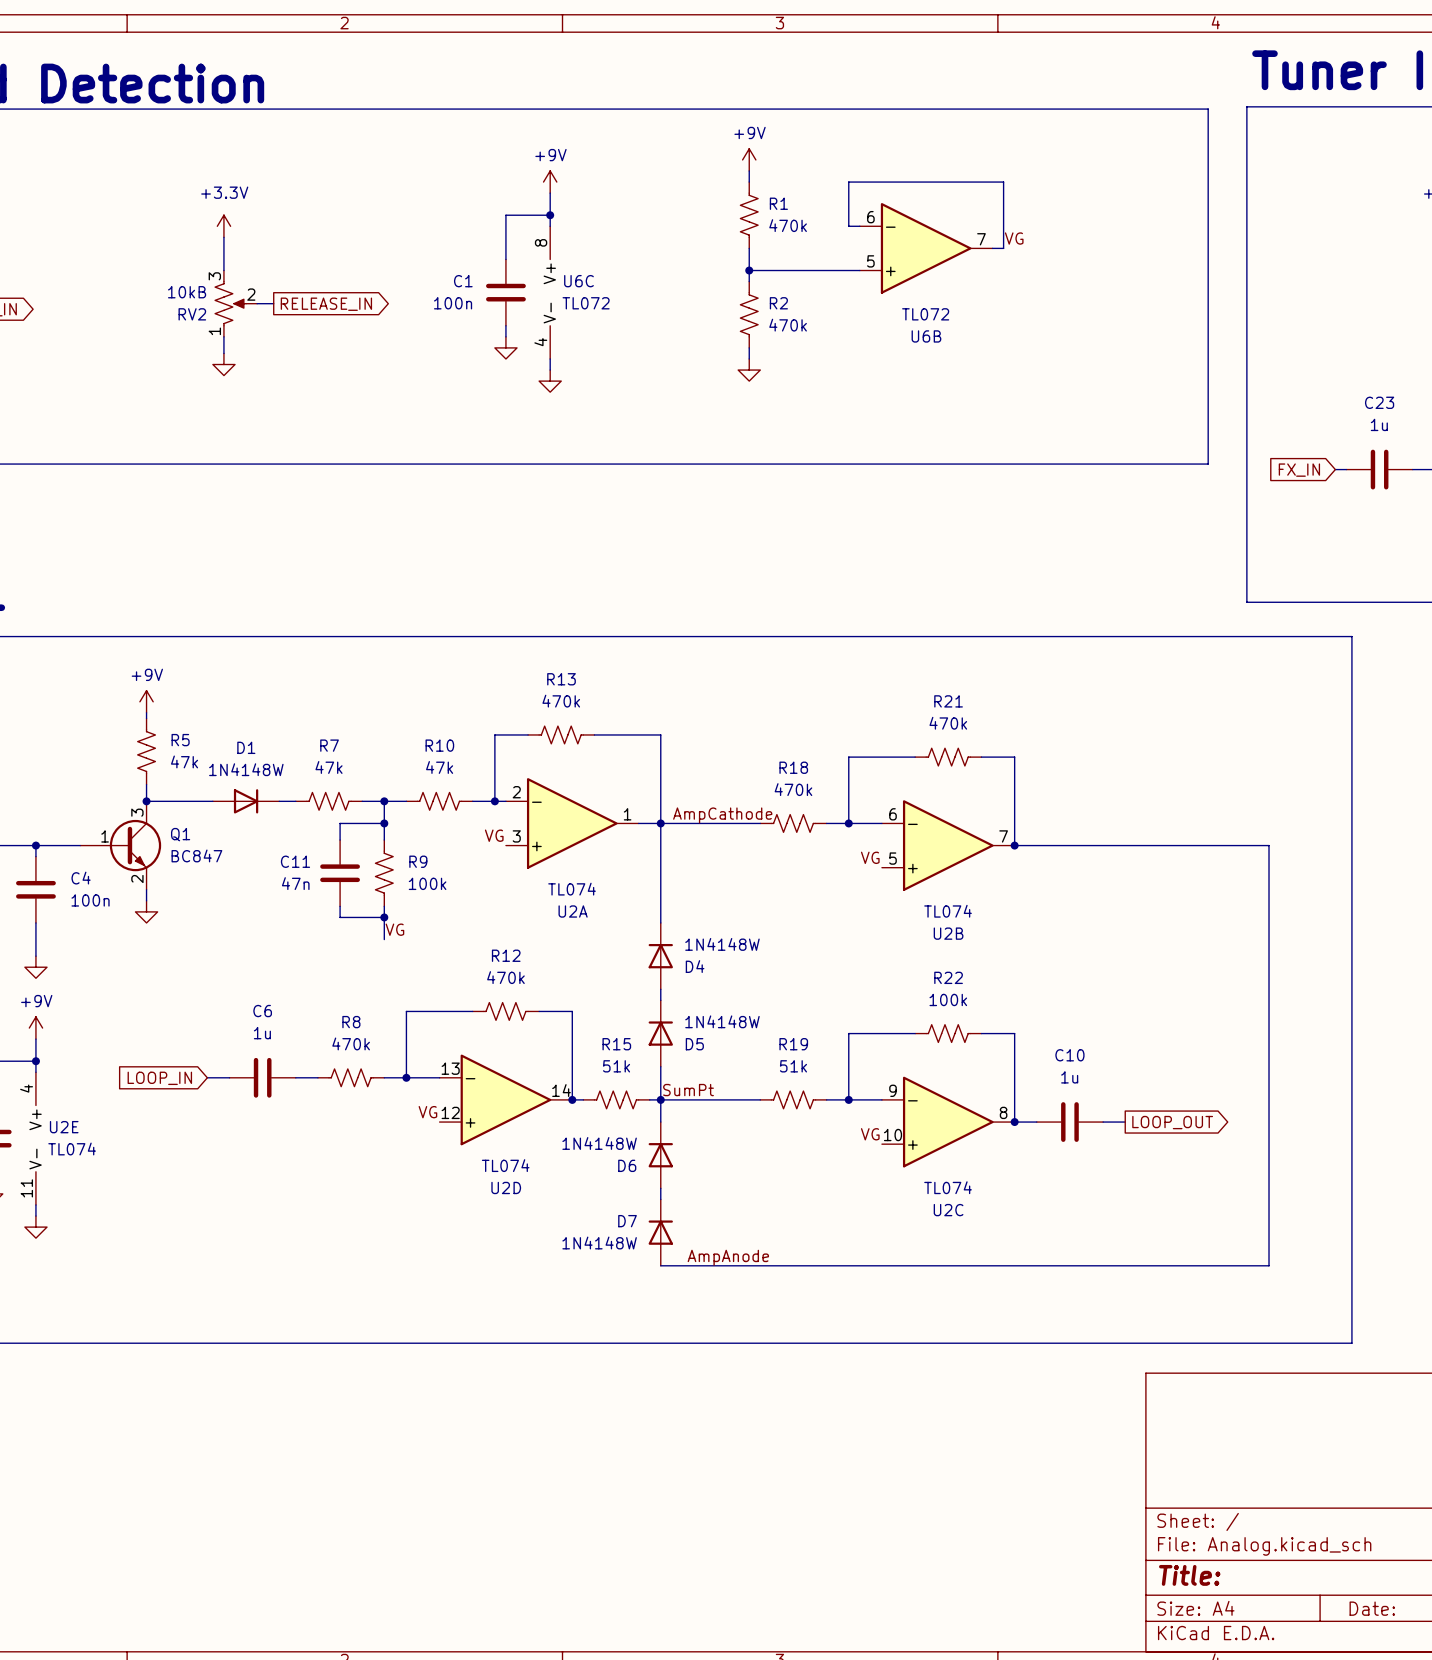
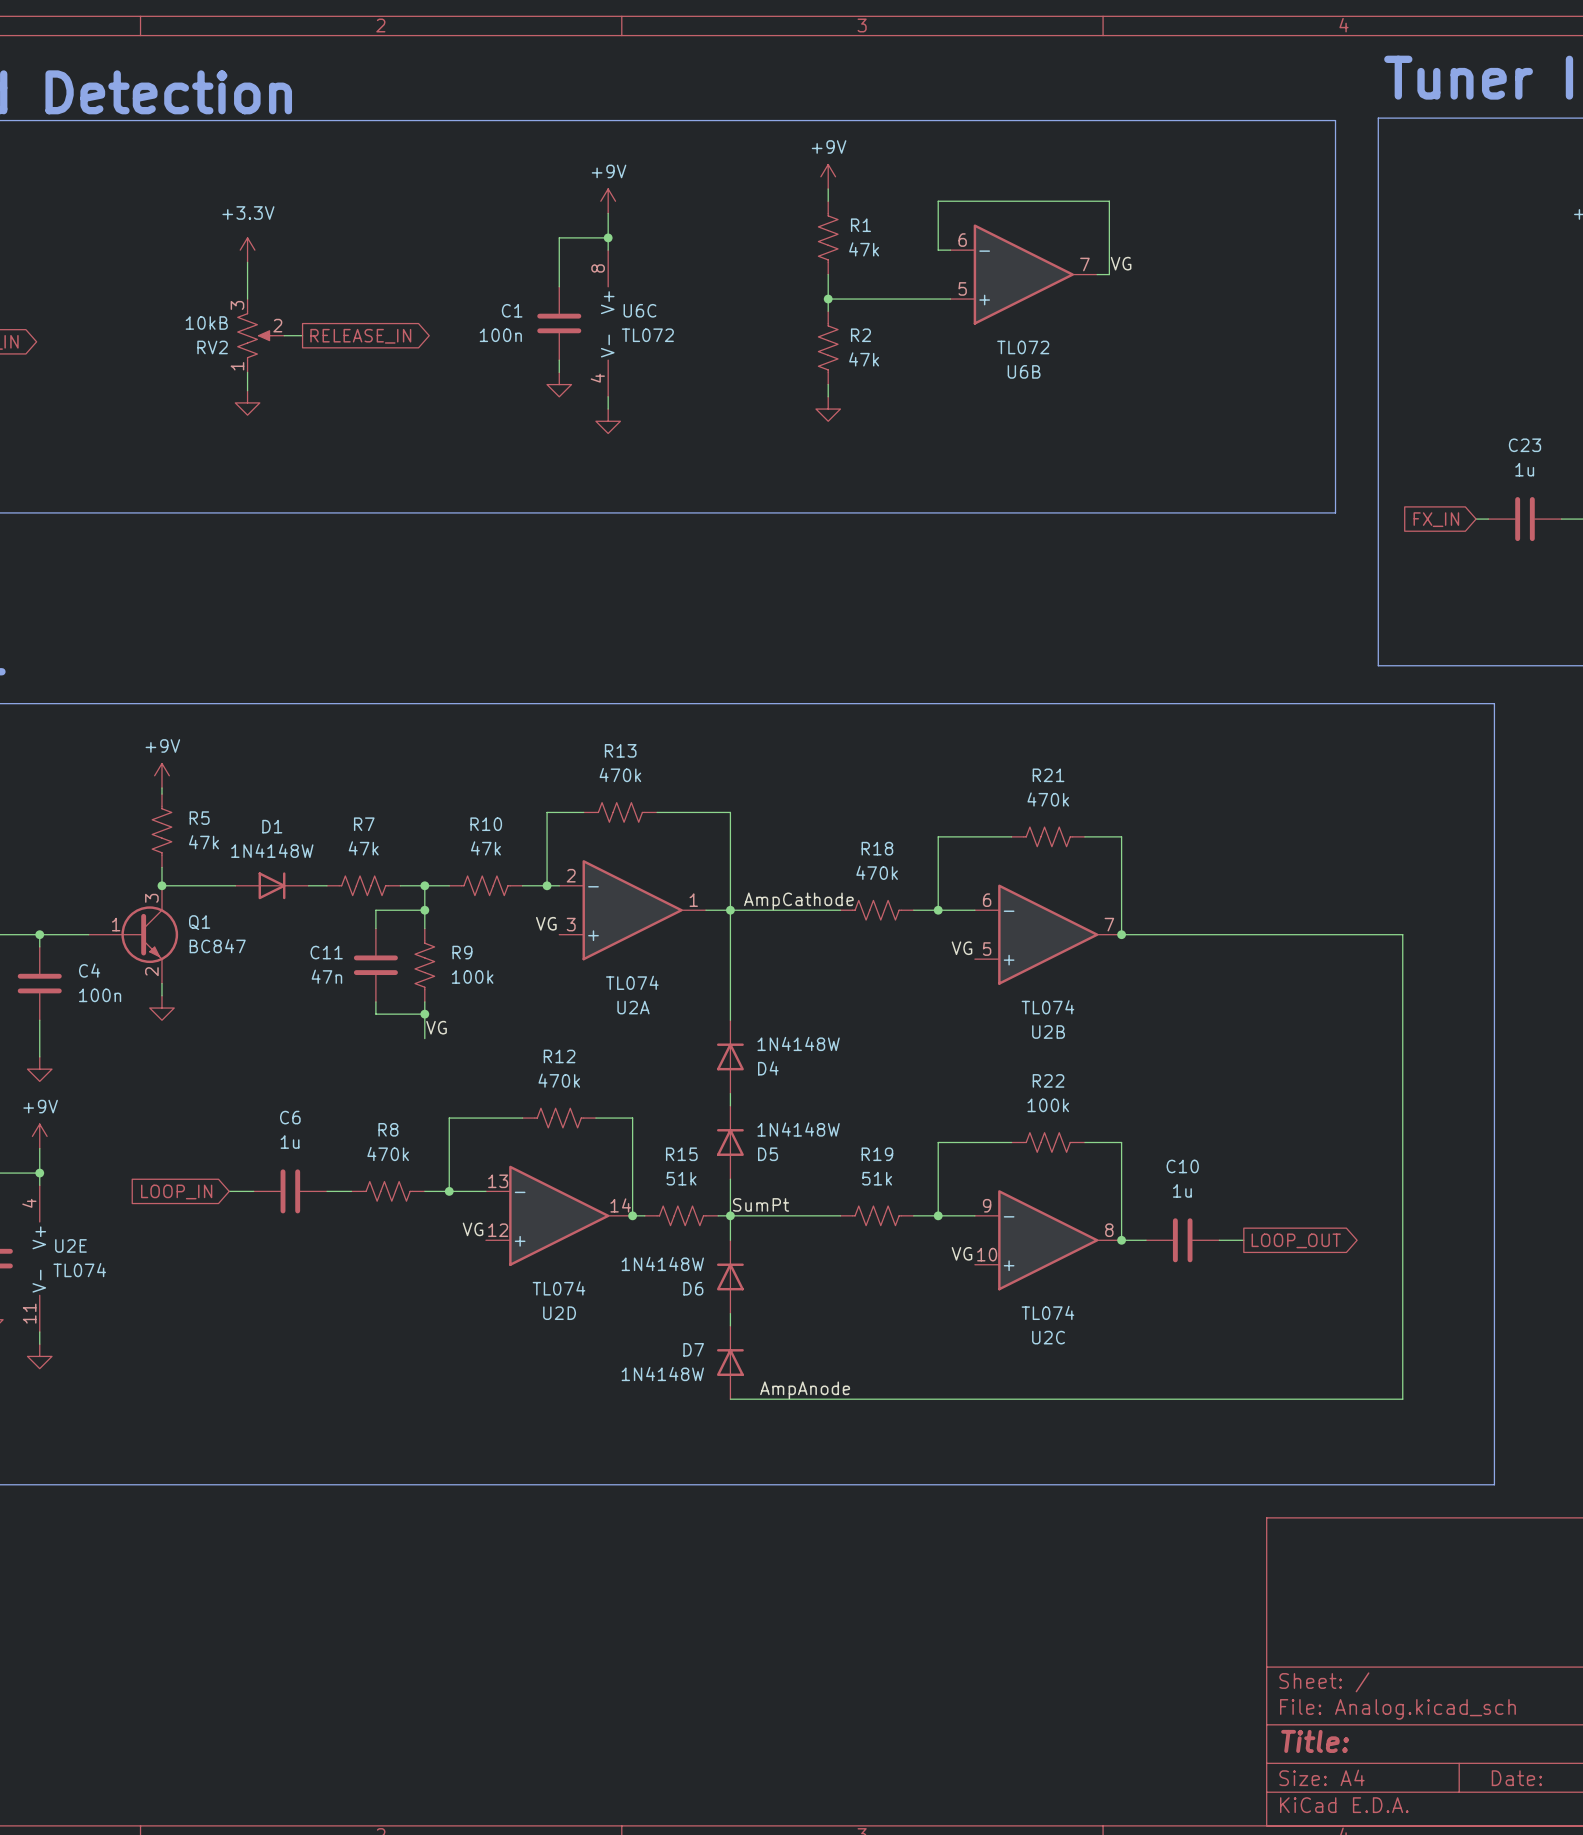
R1 value: 470k (788, 225) -> 47k (864, 249)
R2 value: 470k (788, 325) -> 47k (864, 359)

